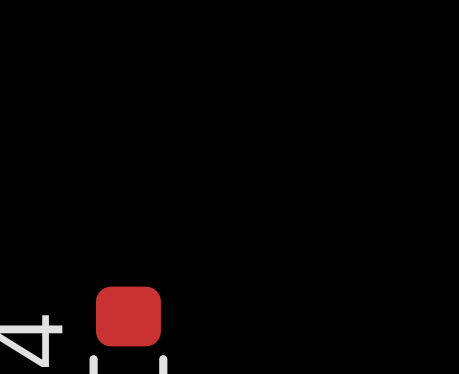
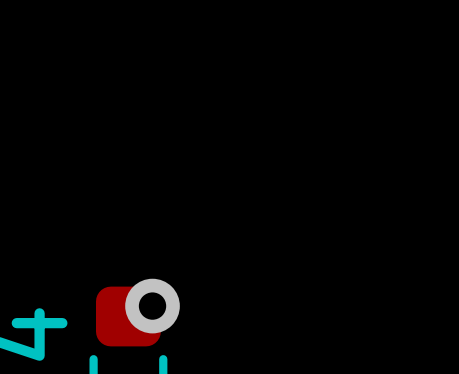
via: none -> (152, 306)

